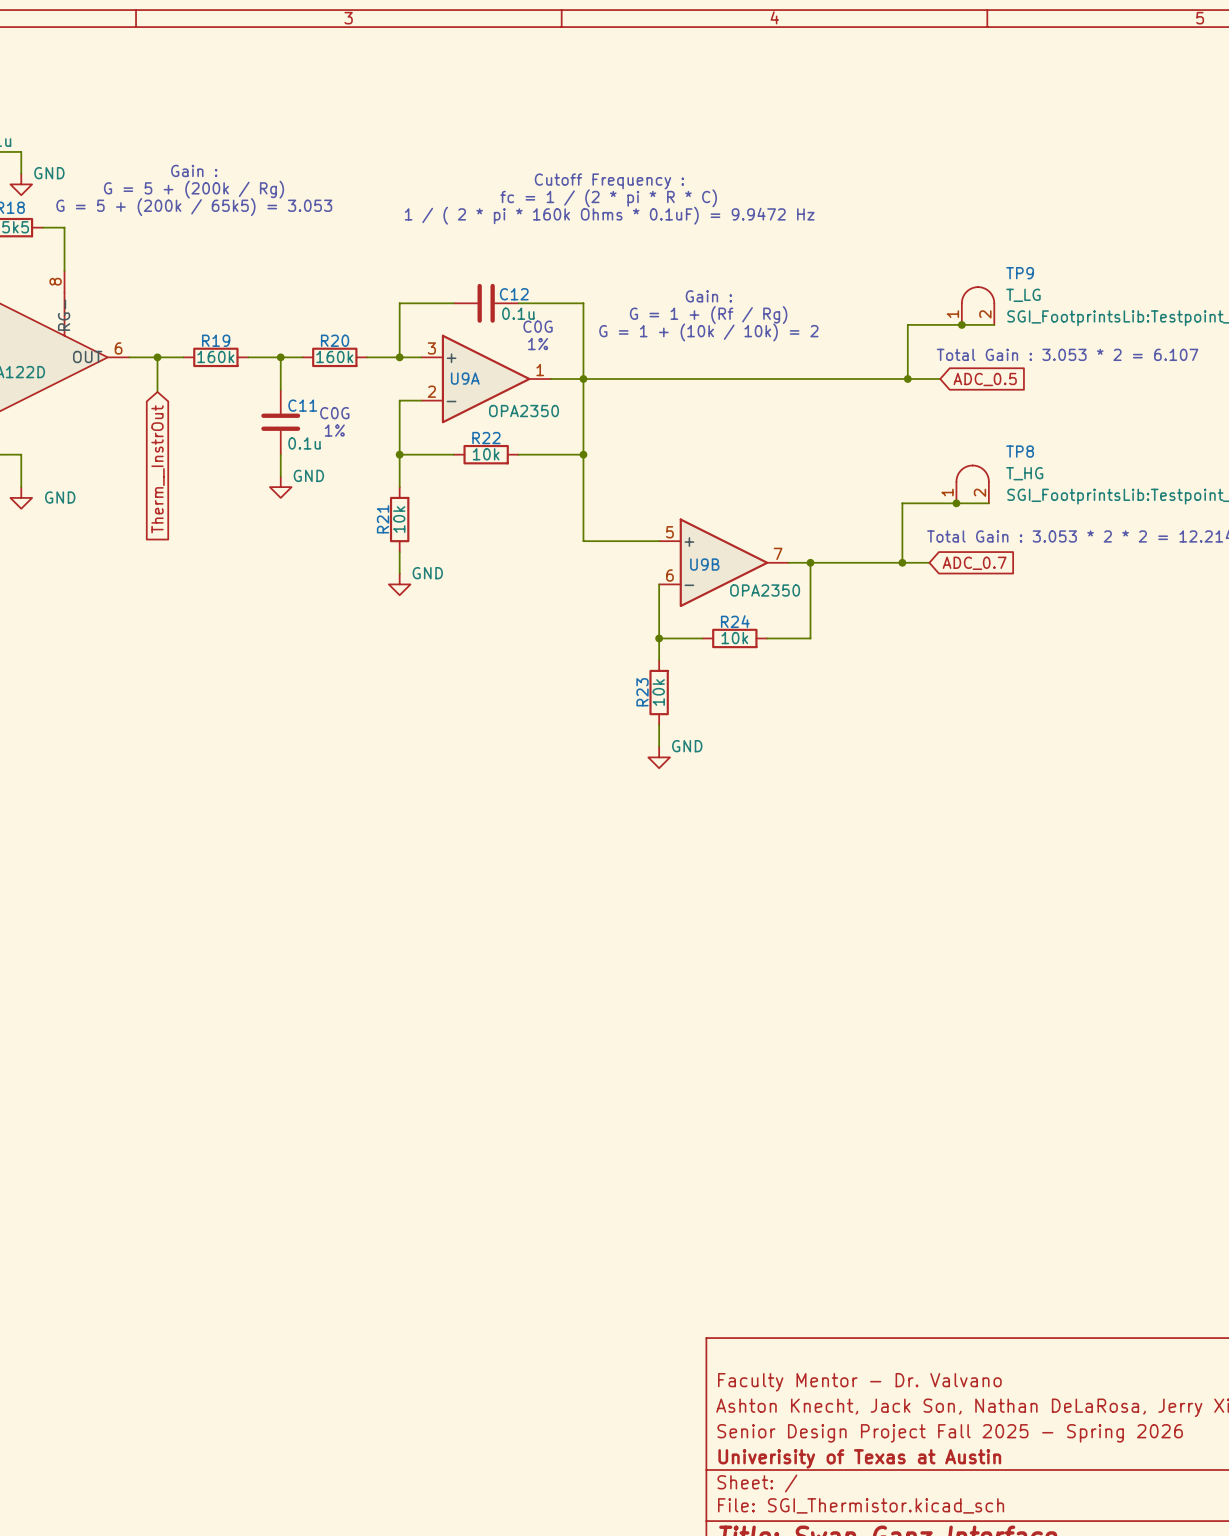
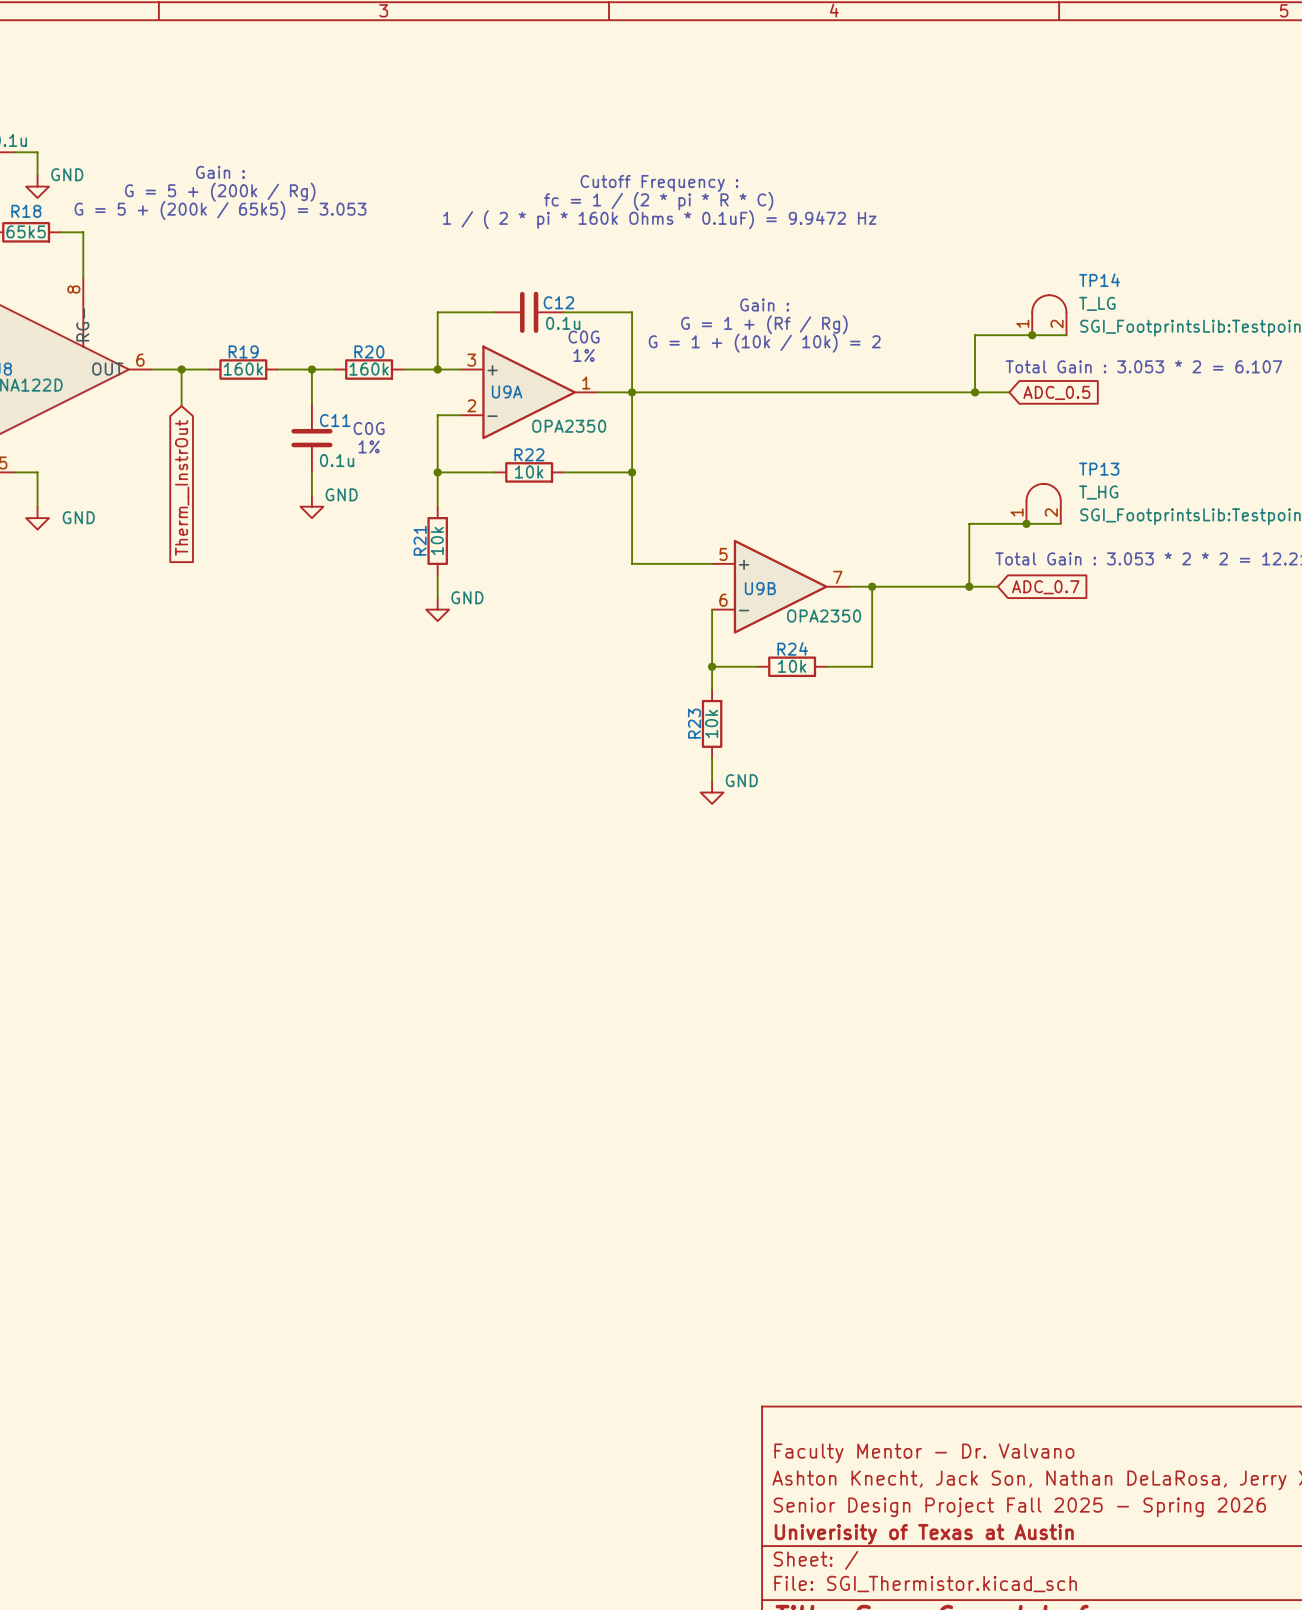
TP9 name: TP9 (1020, 273) -> TP14 (1099, 280)
TP8 name: TP8 (1020, 451) -> TP13 (1099, 469)

